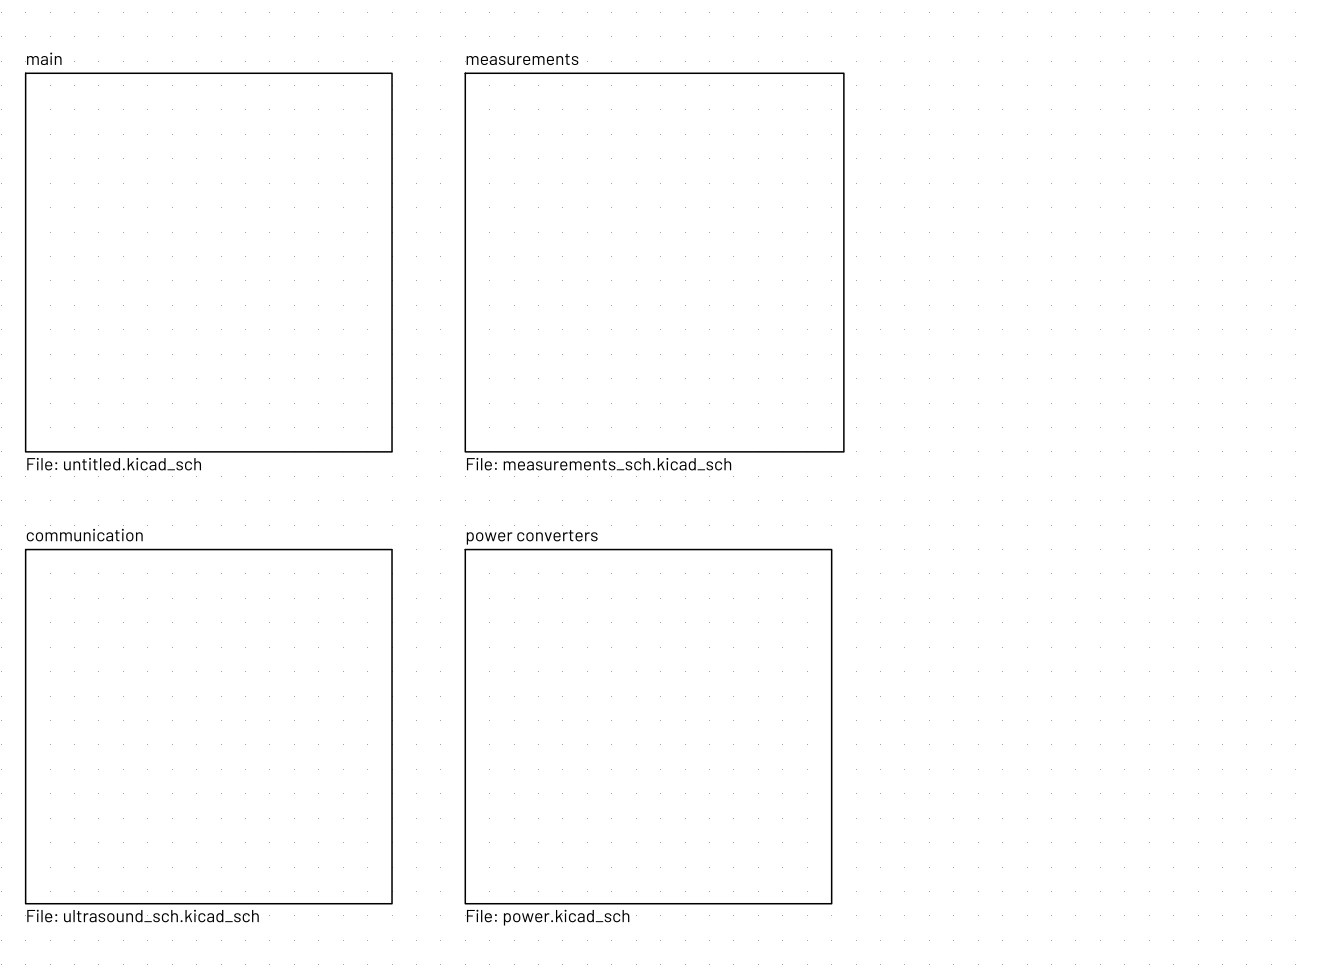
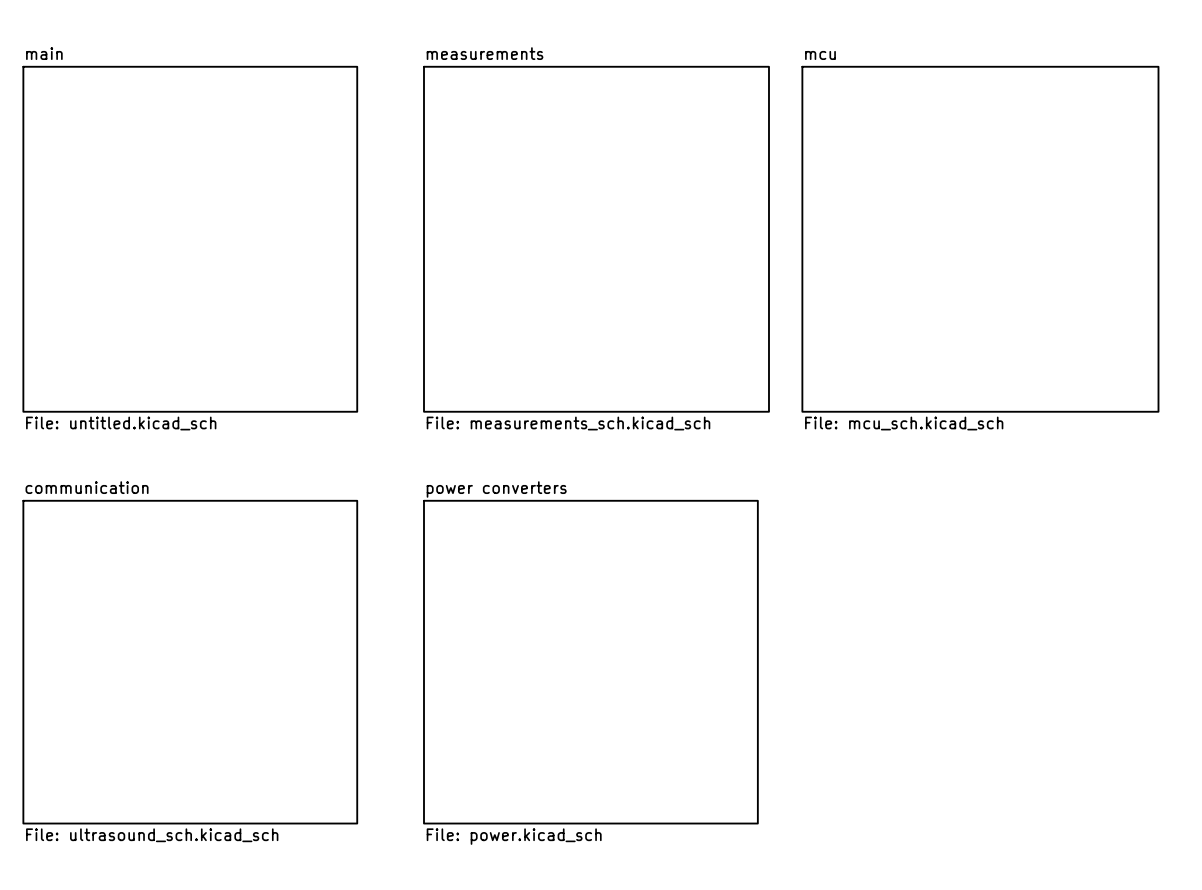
sheet mcu: none -> File: mcu_sch.kicad_sch (980, 239)

